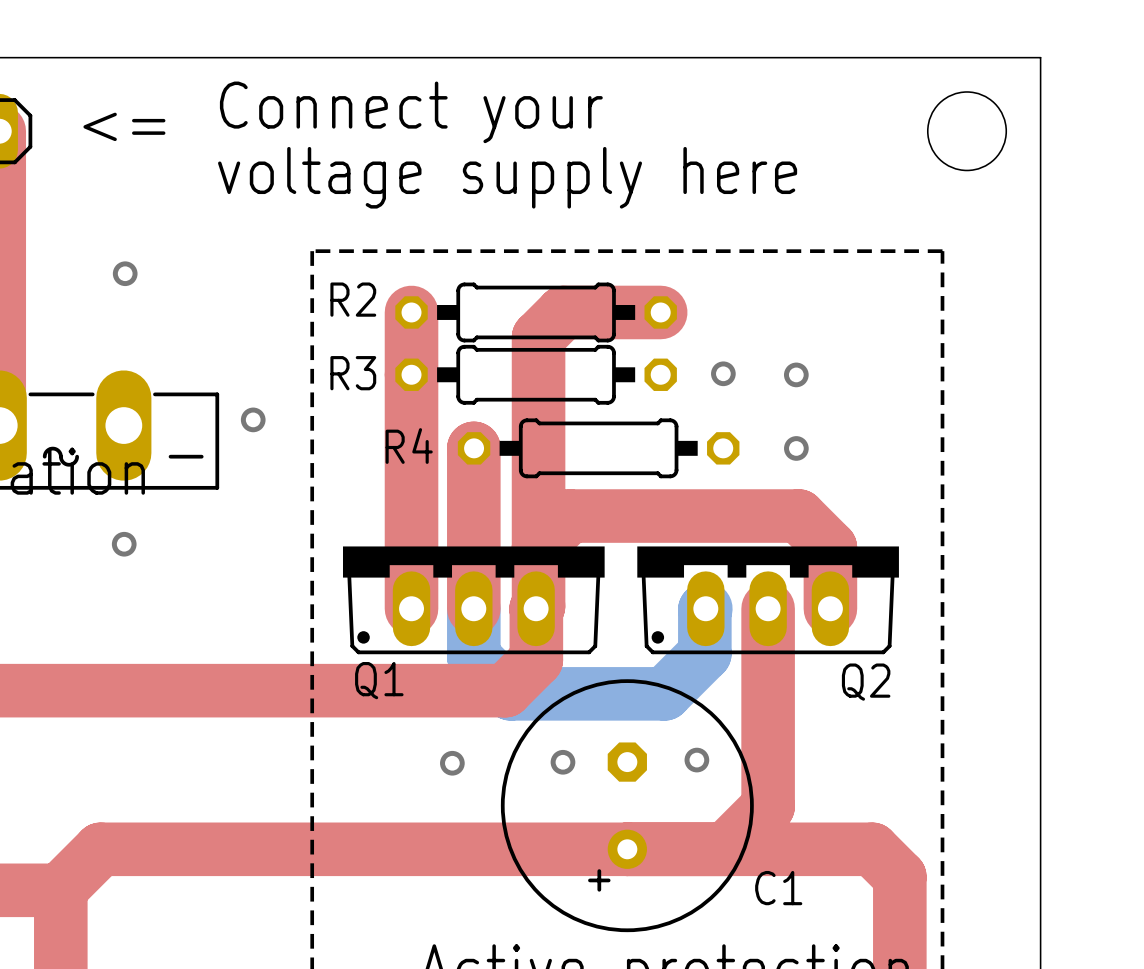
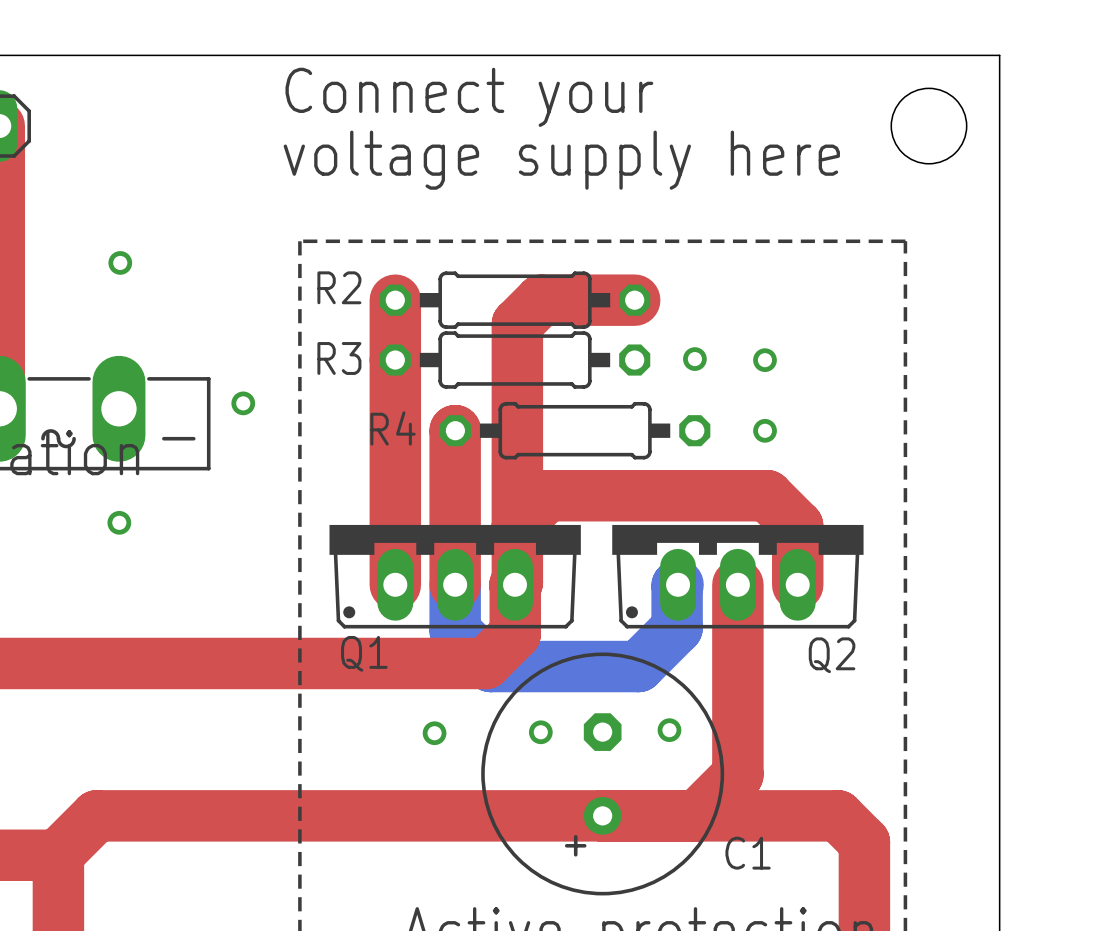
text position: Connect your (411, 112) -> Connect your (469, 97)
text: <= (124, 126) -> none
text position: voltage supply here (507, 177) -> voltage supply here (561, 160)

